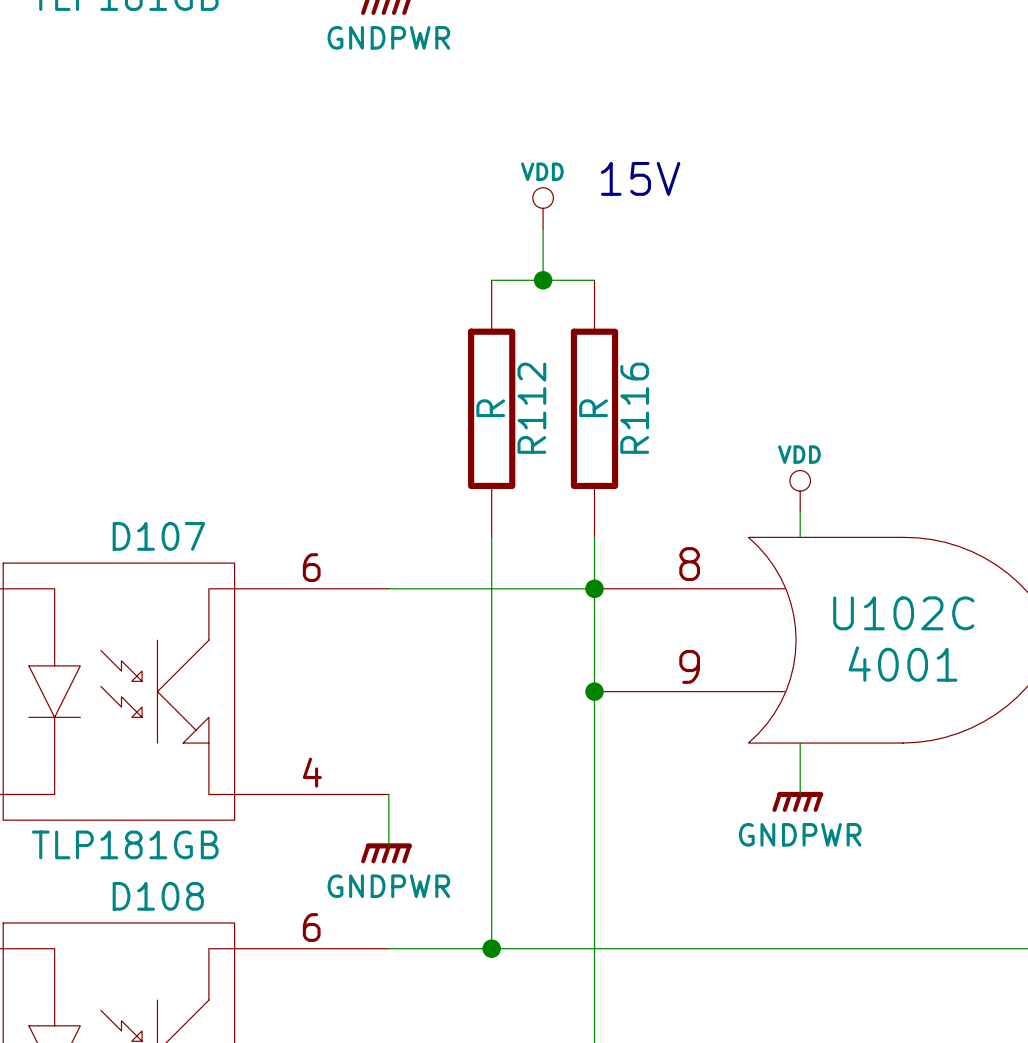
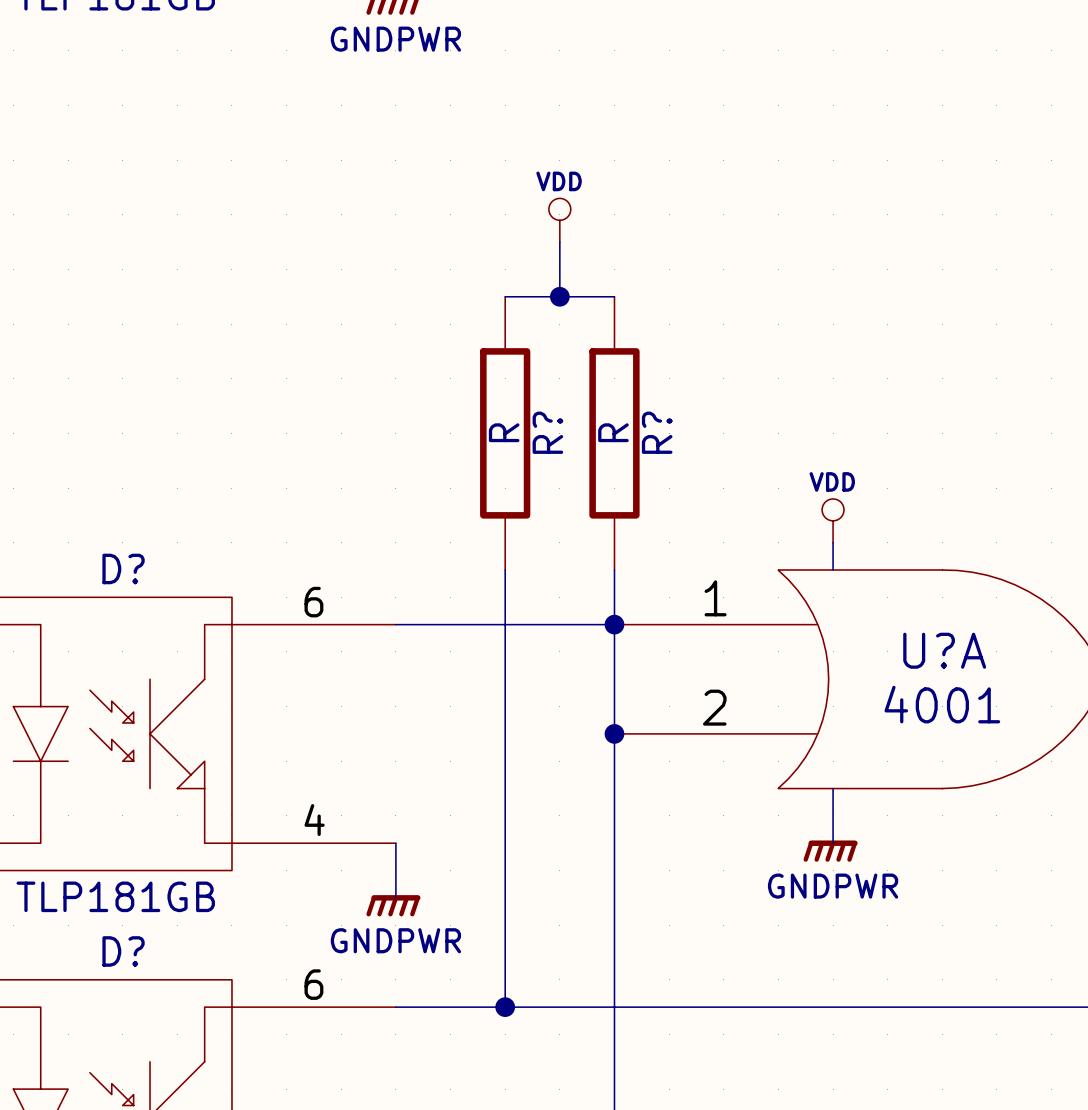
text: 15V (640, 178) -> none
R112 name: R112 (531, 408) -> R? (547, 432)
R116 name: R116 (634, 408) -> R? (657, 432)
D107 name: D107 (158, 536) -> D? (123, 568)
U102C pin number: 8 (689, 564) -> 1 (715, 598)
U102C name: U102C (903, 613) -> U?A (944, 650)
U102C pin number: 9 (689, 666) -> 2 (714, 707)
D108 name: D108 (158, 896) -> D? (123, 951)

